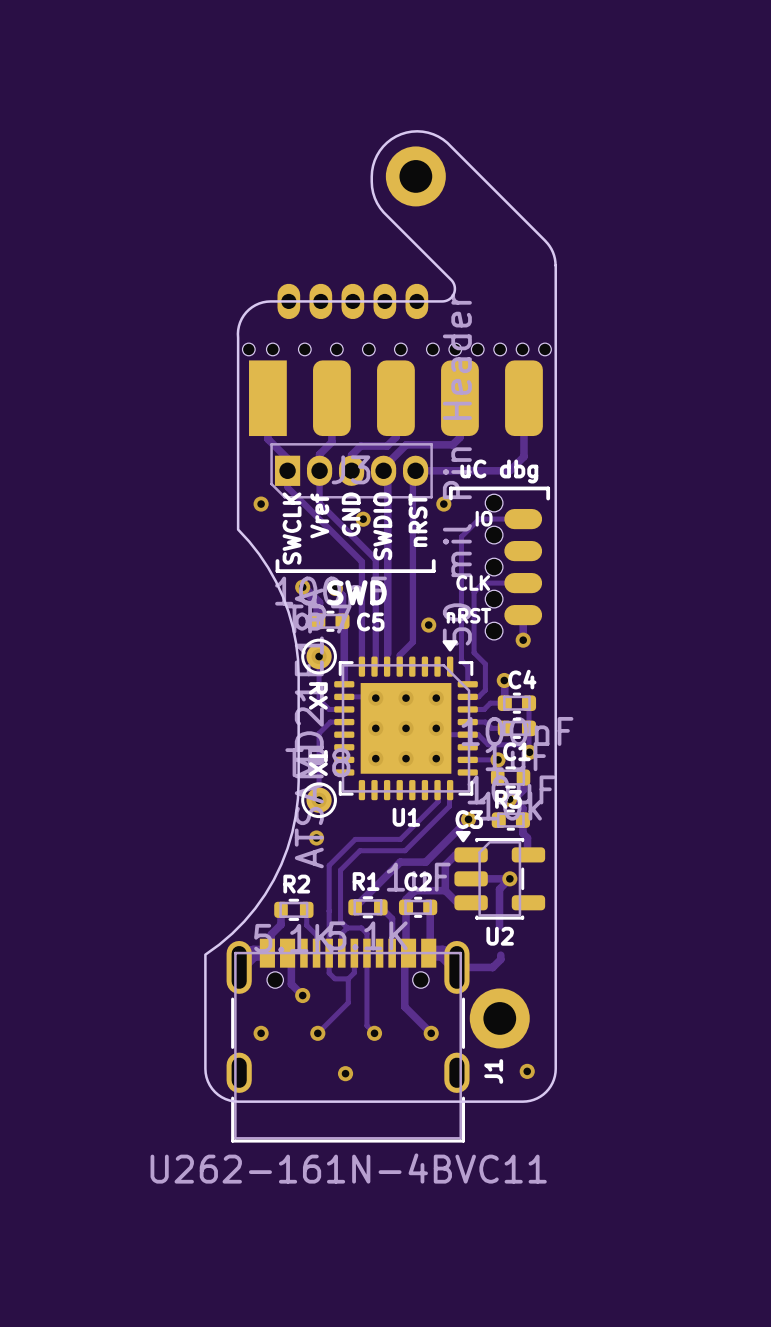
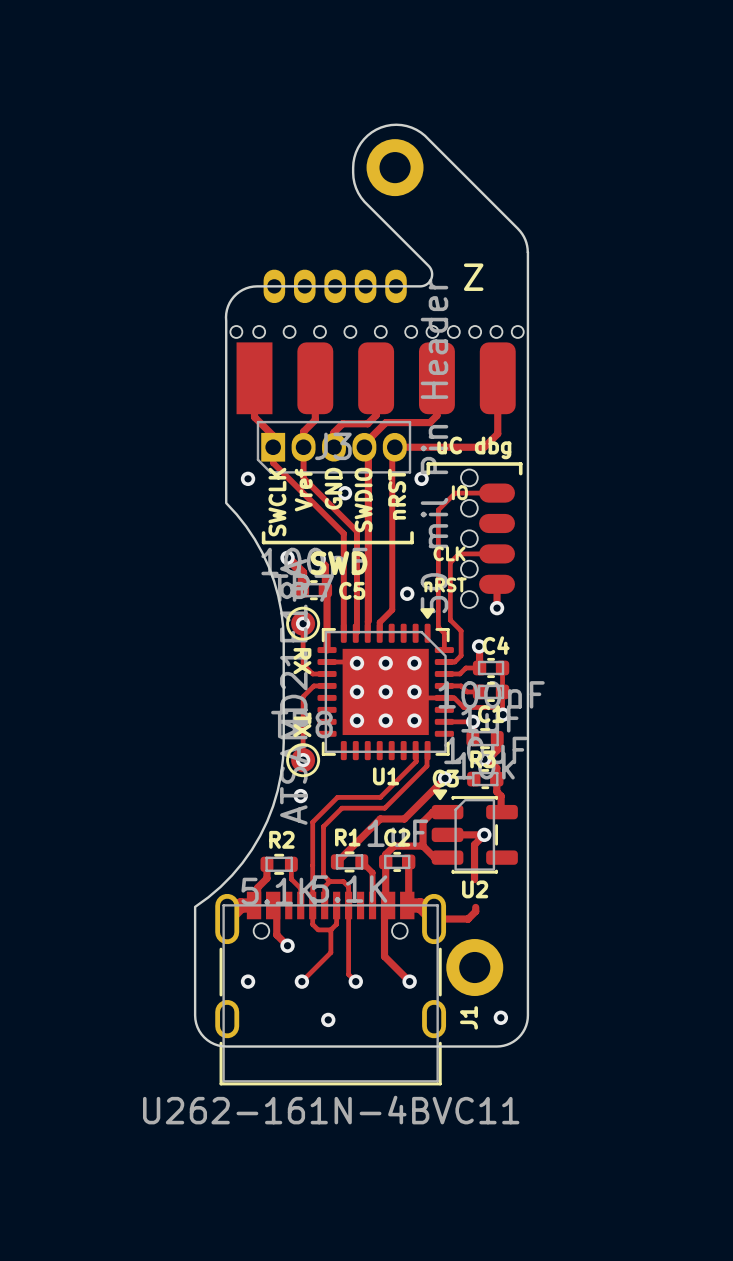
text: none -> Z (473, 277)

